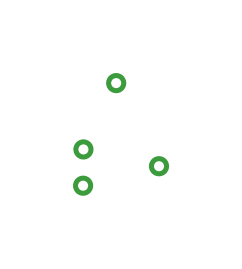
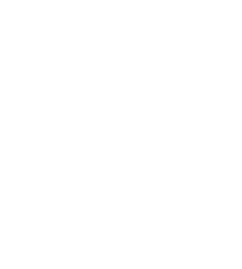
via: (116, 83) -> none
via: (83, 149) -> none
via: (159, 166) -> none
via: (83, 185) -> none

